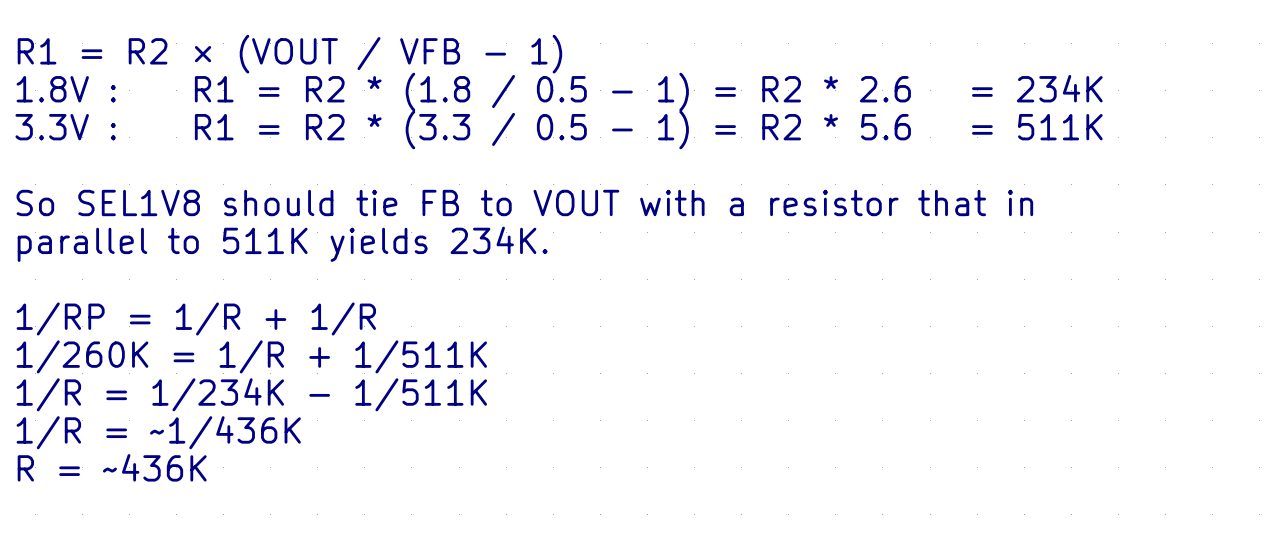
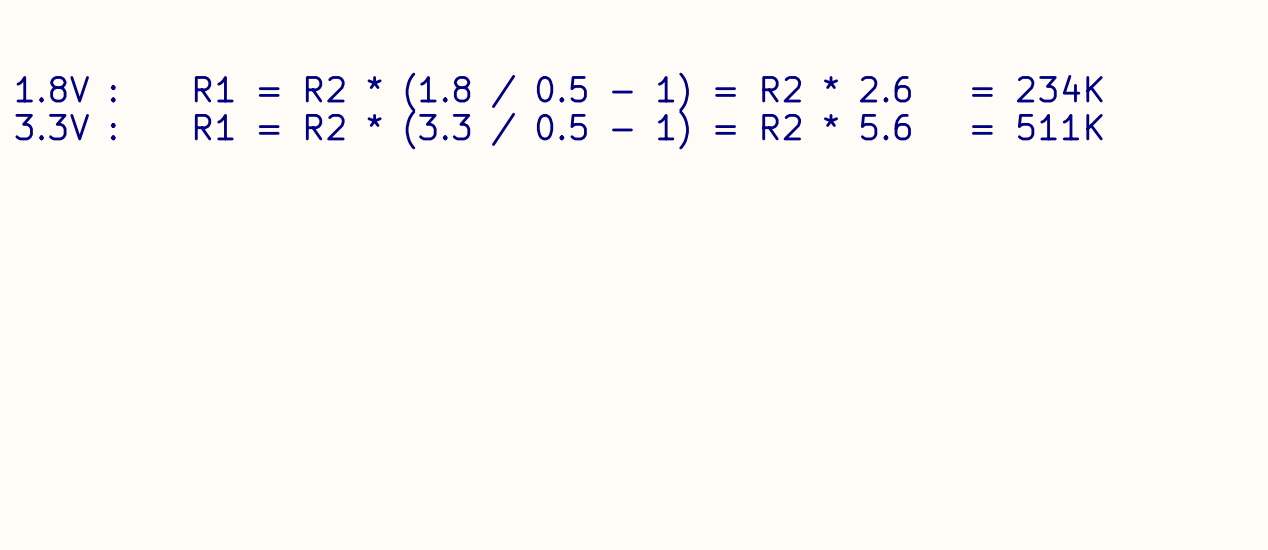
text: R1 = R2 × (VOUT / VFB - 1) (289, 54) -> none
text: So SEL1V8 should tie FB to VOUT with a resistor that in (524, 202) -> none
text: parallel to 511K yields 234K. (282, 244) -> none
text: 1/RP = 1/R + 1/R (196, 318) -> none
text: 1/260K = 1/R + 1/511K (251, 356) -> none
text: 1/R = 1/234K - 1/511K (251, 394) -> none
text: 1/R = ~1/436K (158, 432) -> none
text: R = ~436K (112, 467) -> none

